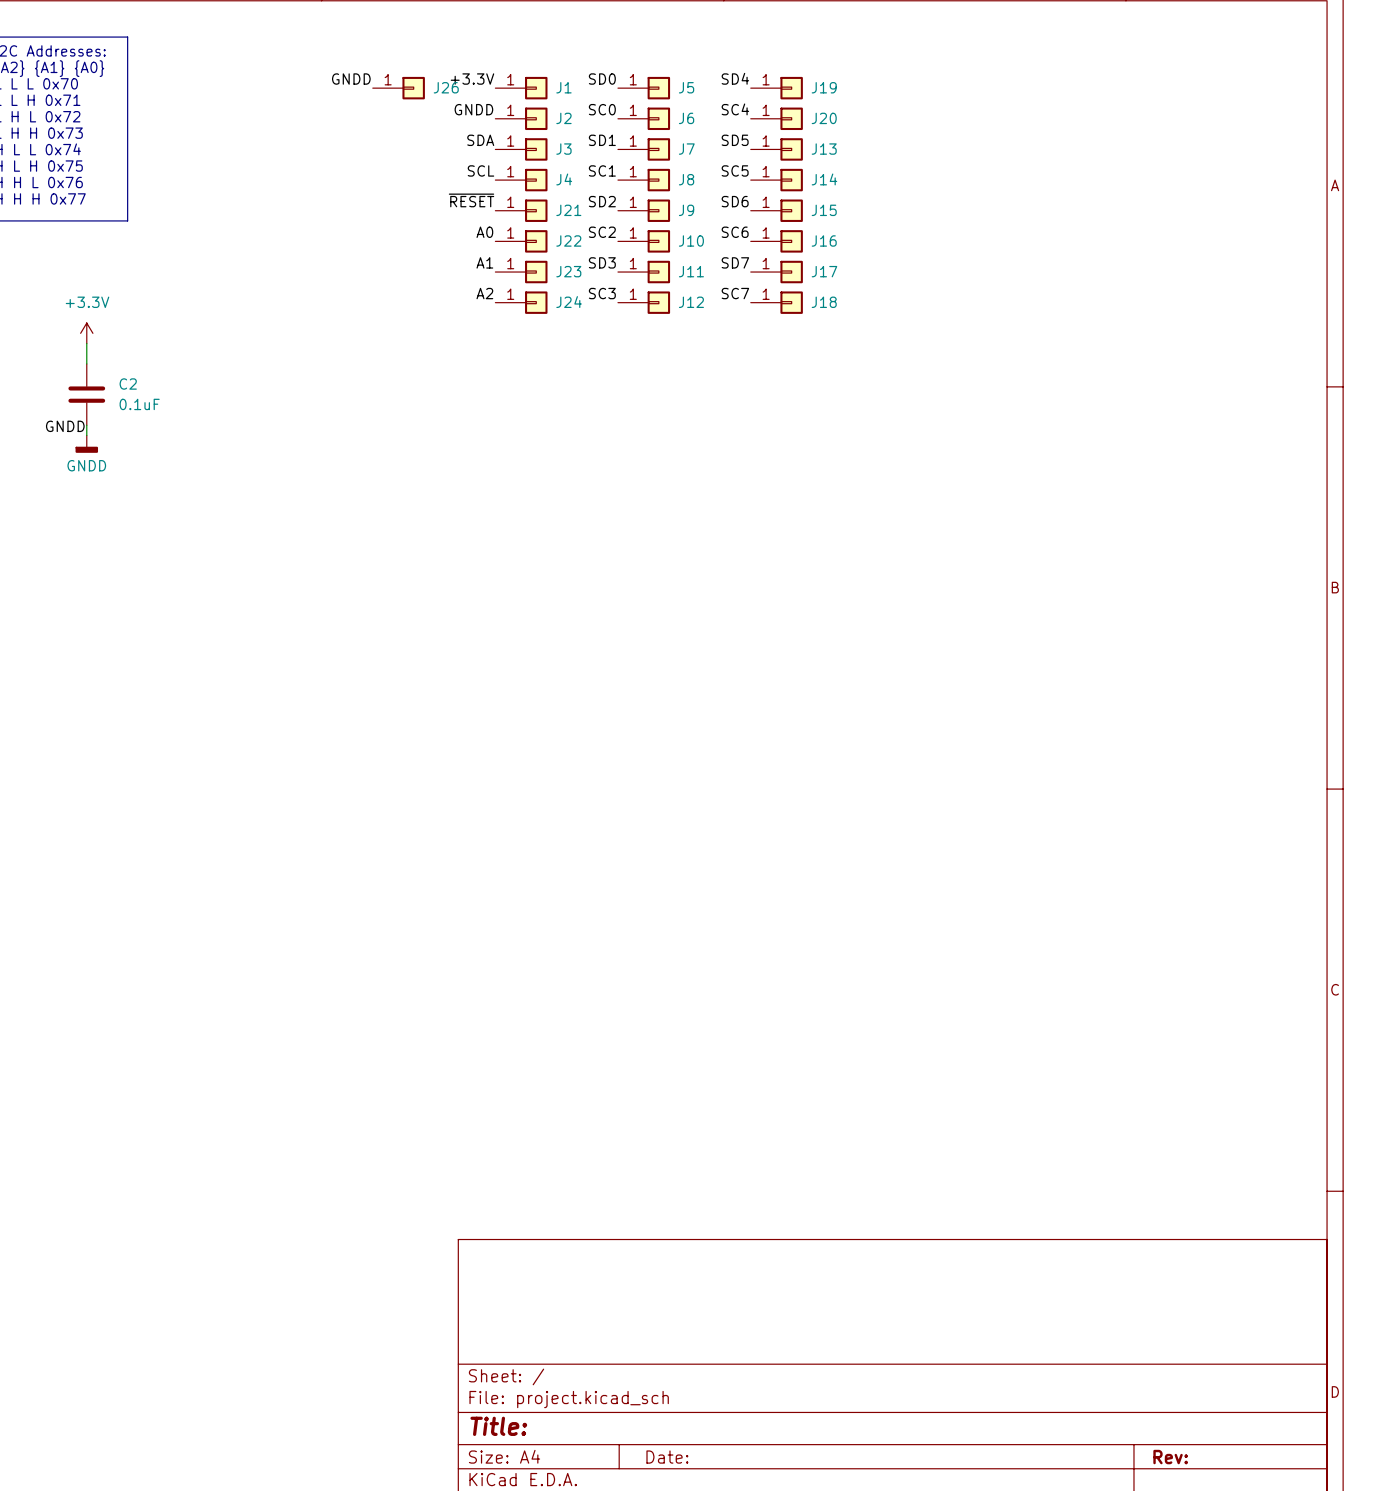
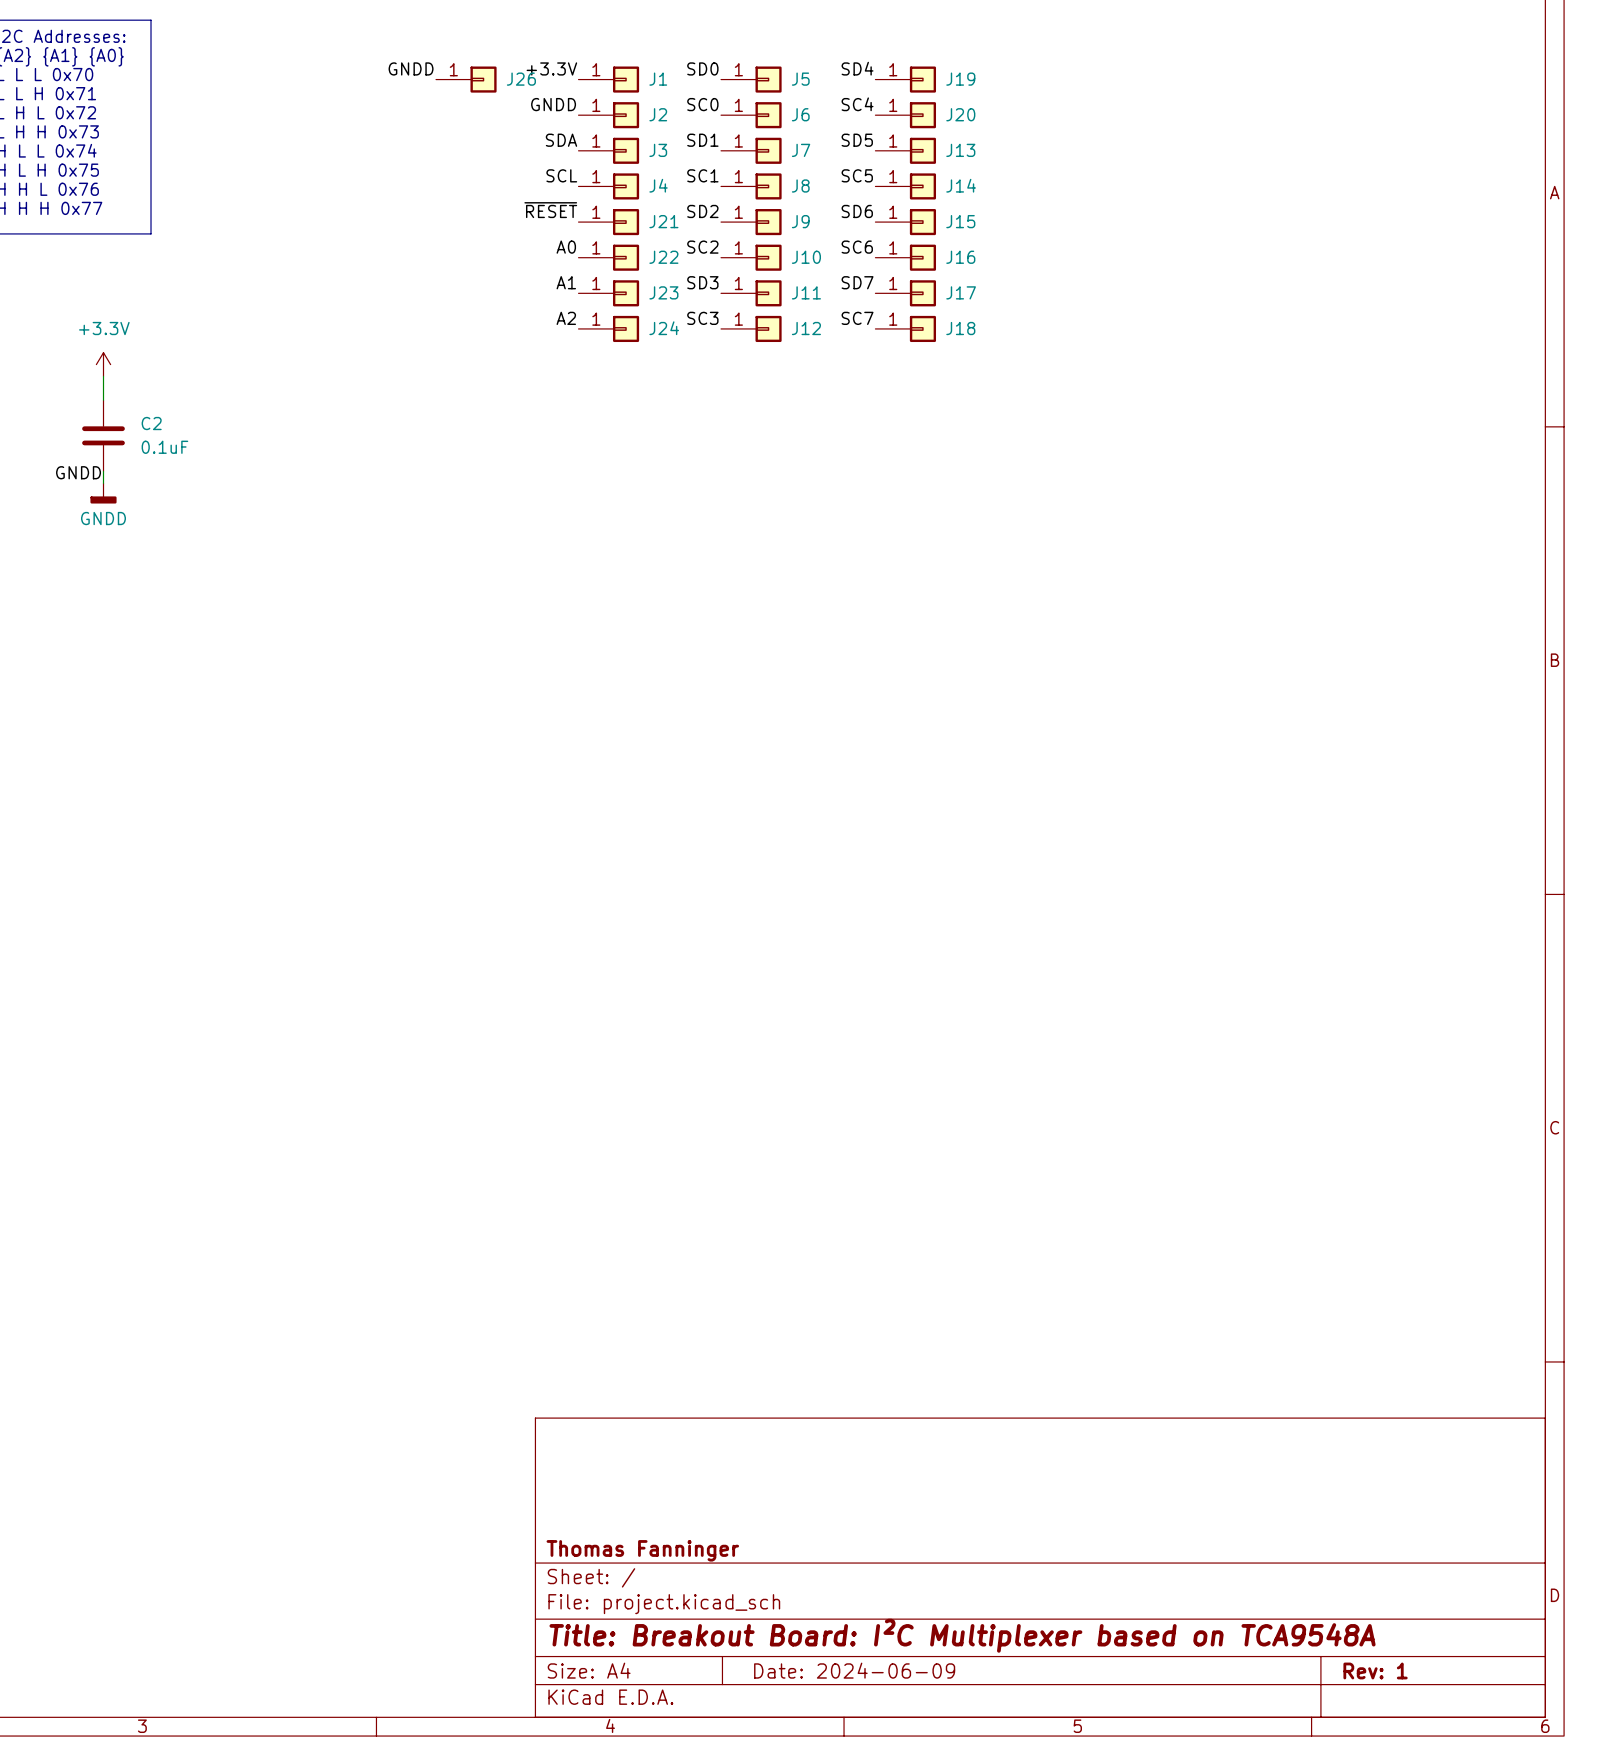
title block: none -> Thomas Fanninger (642, 1550)
title block: Title: (498, 1426) -> Title: Breakout Board: I²C Multiplexer based on TCA9548A (962, 1635)
title block: Date: (667, 1457) -> Date: 2024-06-09 (854, 1670)
title block: Rev: (1170, 1457) -> Rev: 1 (1375, 1670)

